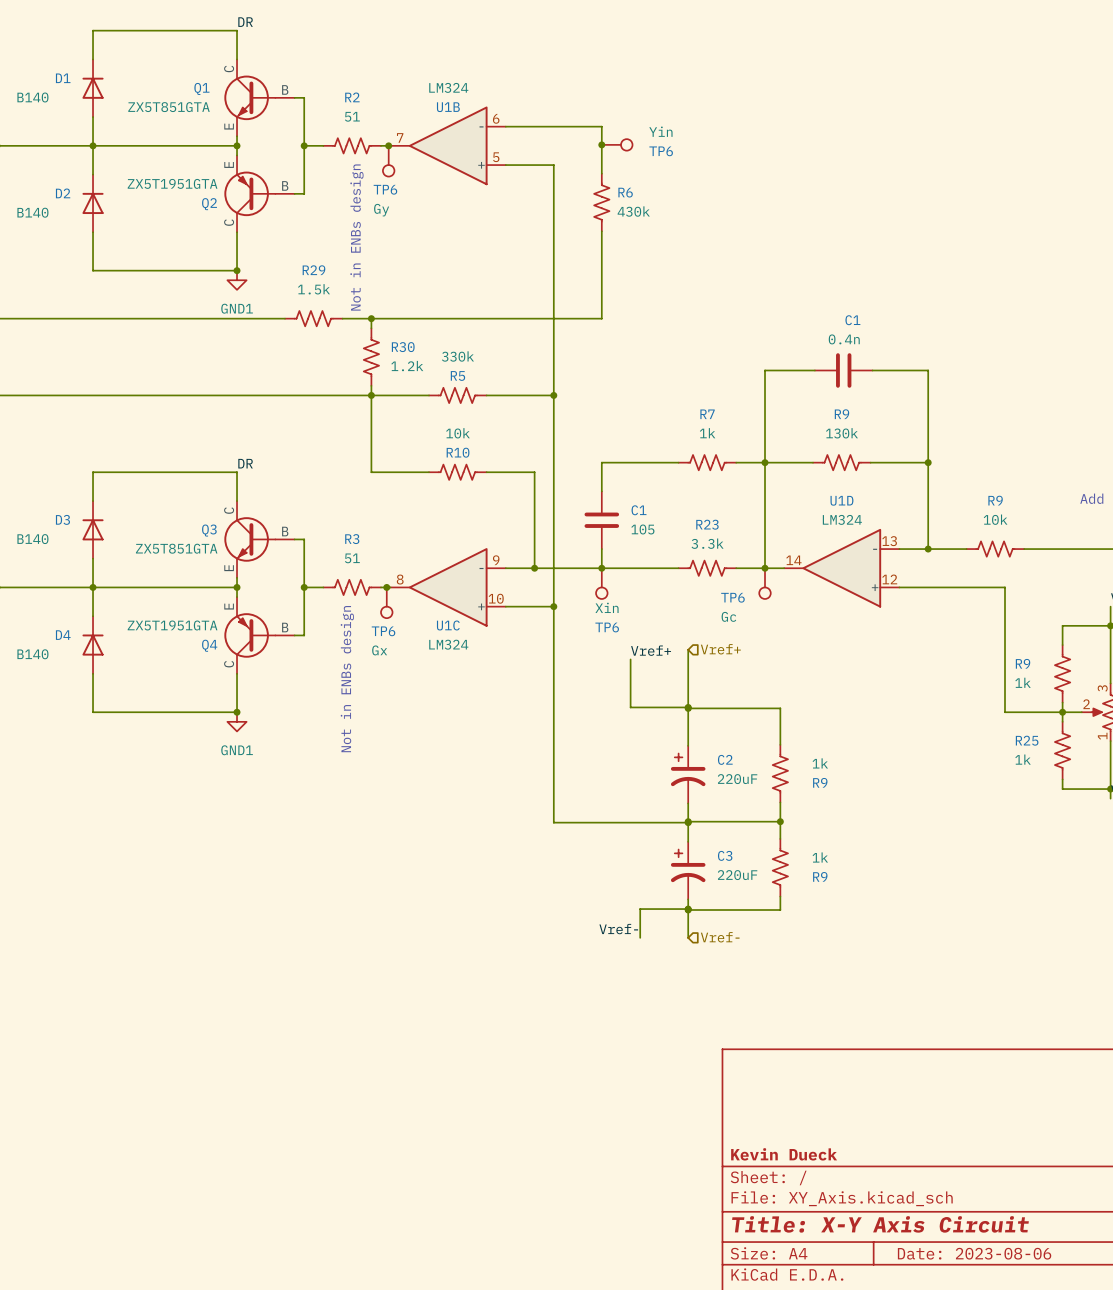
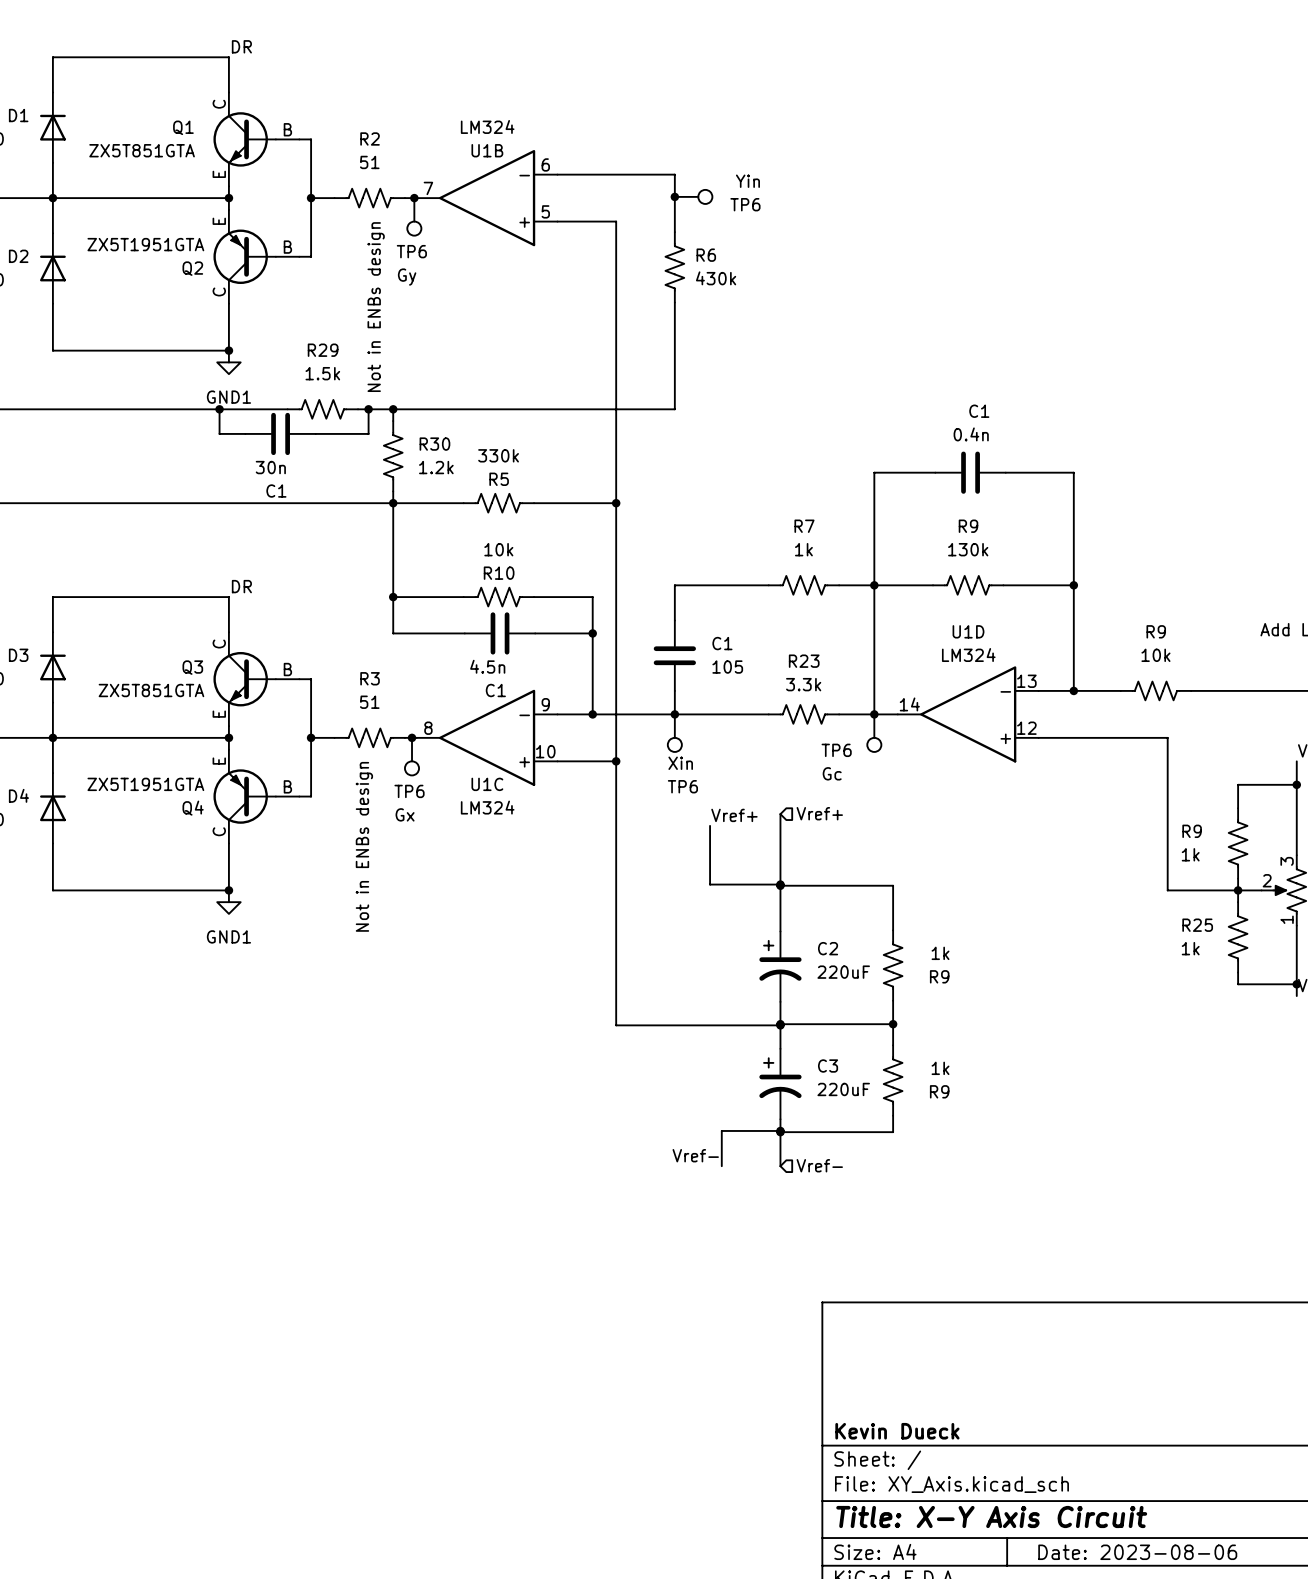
wire: none -> (219, 409) (219, 433) (245, 433)
junction: none -> (219, 409)
wire: none -> (368, 409) (368, 433) (315, 433)
junction: none -> (368, 409)
C1: none -> 30n (280, 433)
wire: none -> (393, 597) (393, 633) (464, 633)
junction: none -> (393, 597)
C1: none -> 4.5n (500, 633)
wire: none -> (535, 633) (592, 633)
junction: none -> (592, 633)

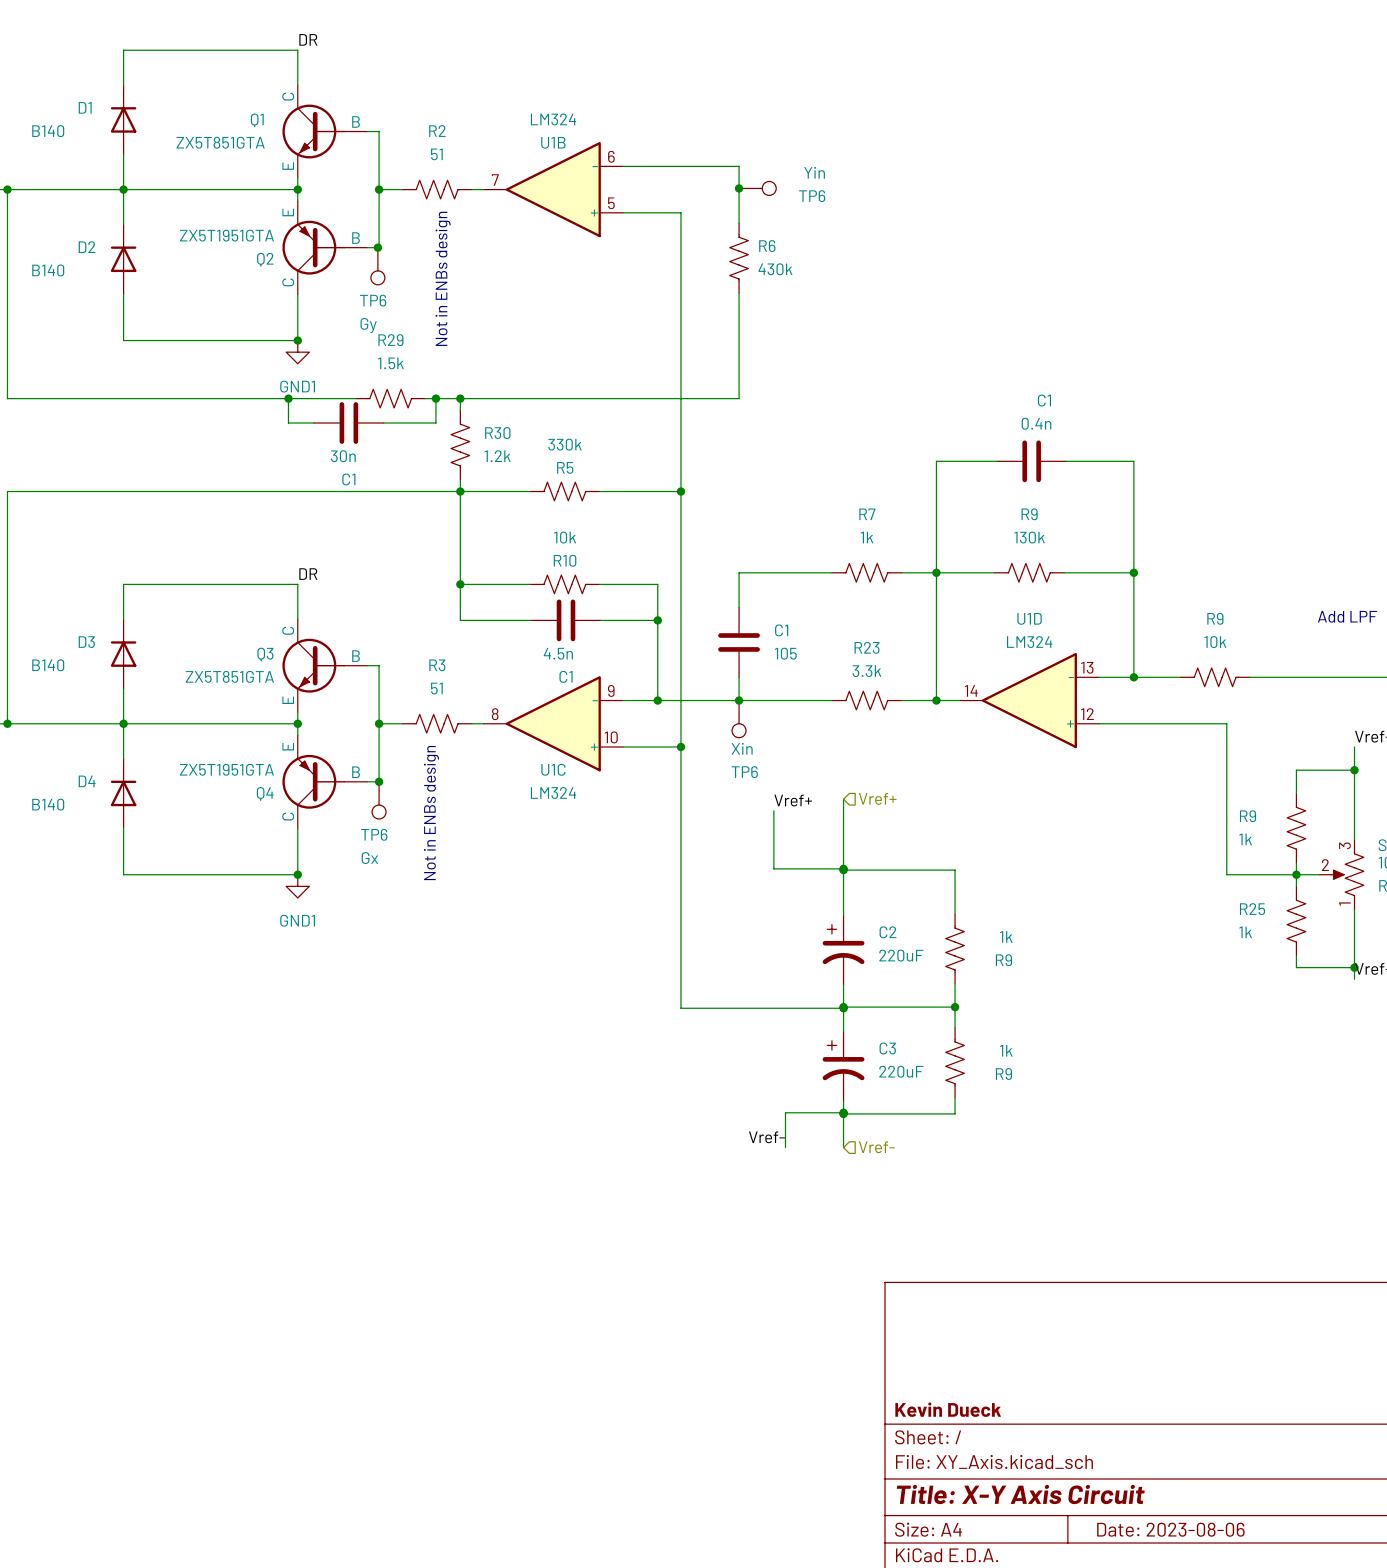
junction: (414, 198) -> none
TP6 position: (414, 216) -> (377, 266)
junction: none -> (377, 247)
TP6: Gc (874, 733) -> none
junction: (412, 737) -> none
TP6 position: (412, 756) -> (379, 800)
junction: none -> (379, 781)

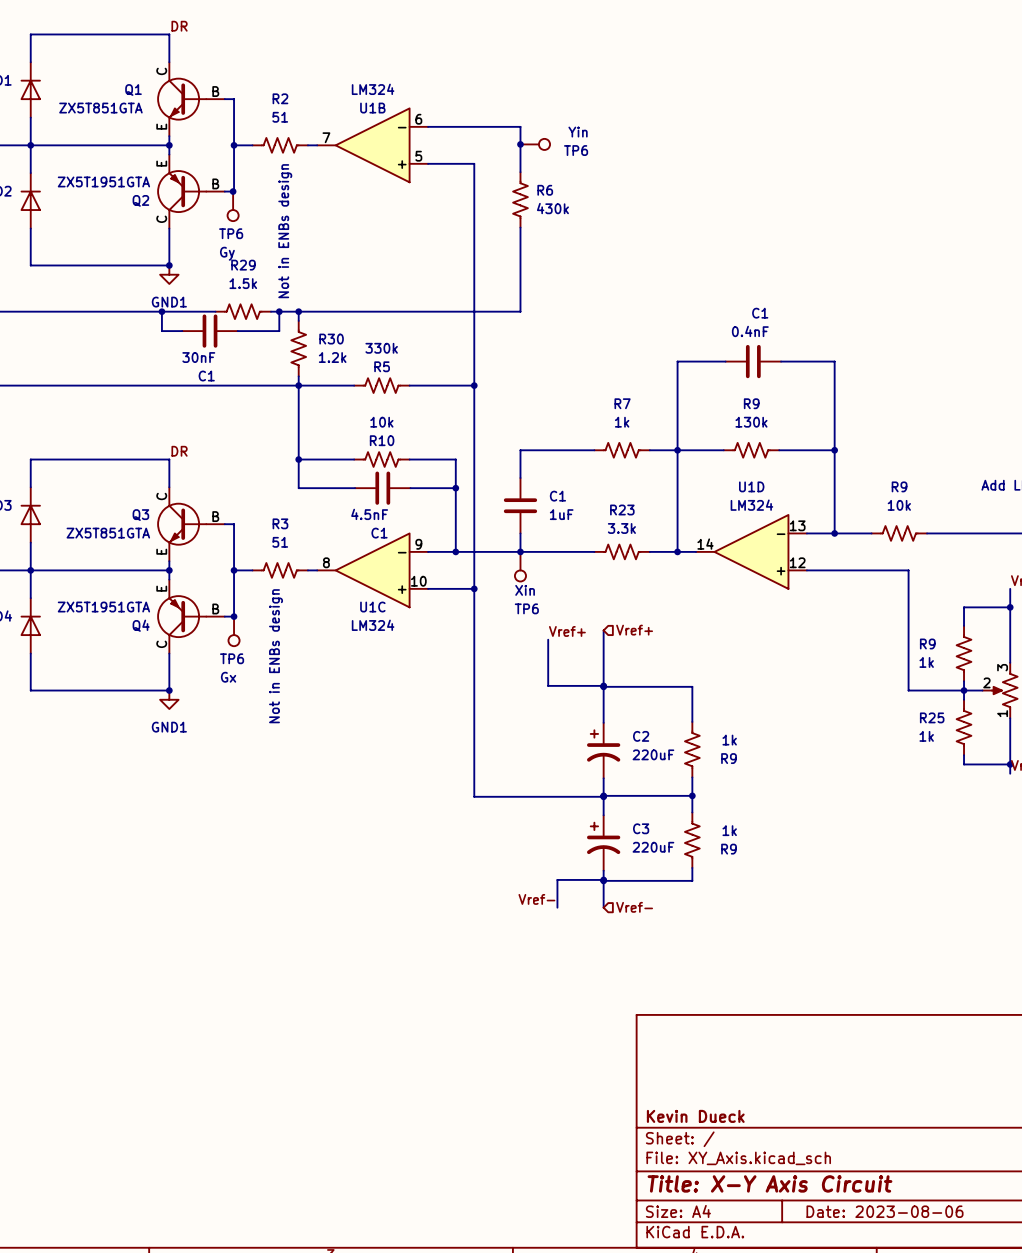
C1 value: 0.4n (1036, 423) -> 0.4nF (750, 331)
C1 value: 30n (343, 456) -> 30nF (198, 357)
C1 value: 4.5n (558, 653) -> 4.5nF (369, 514)
C1 value: 105 (785, 653) -> 1uF (561, 514)

